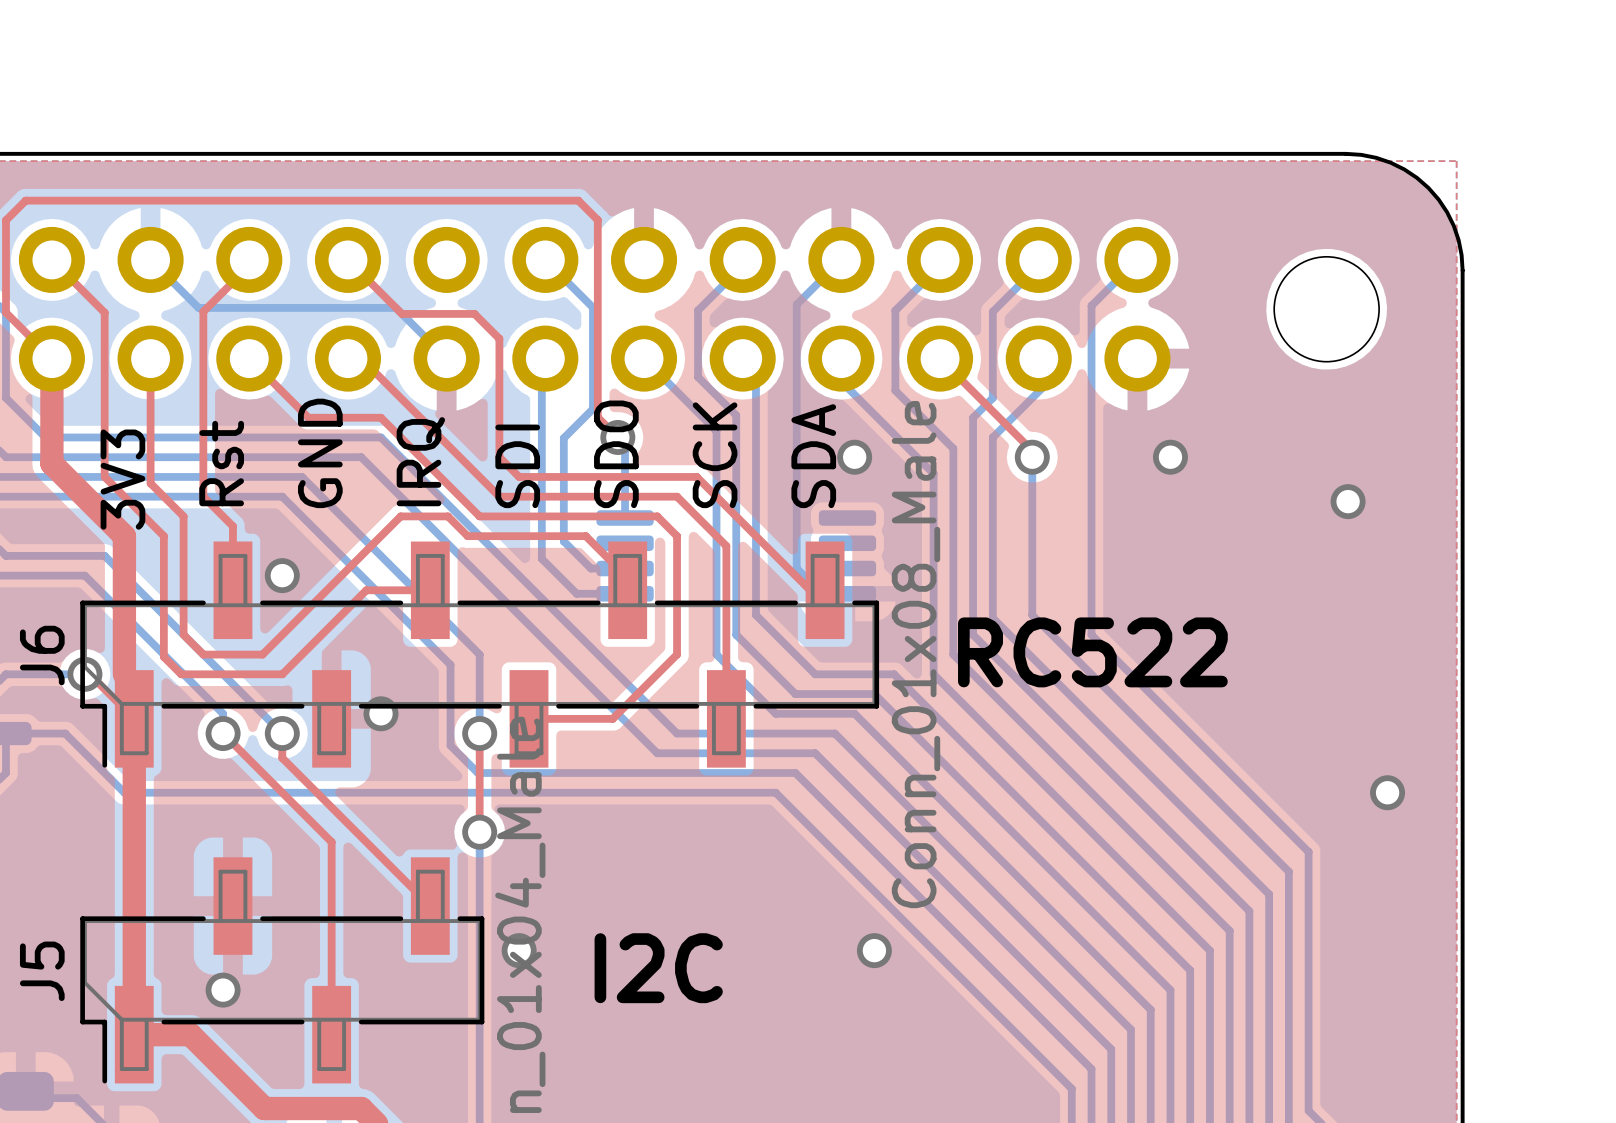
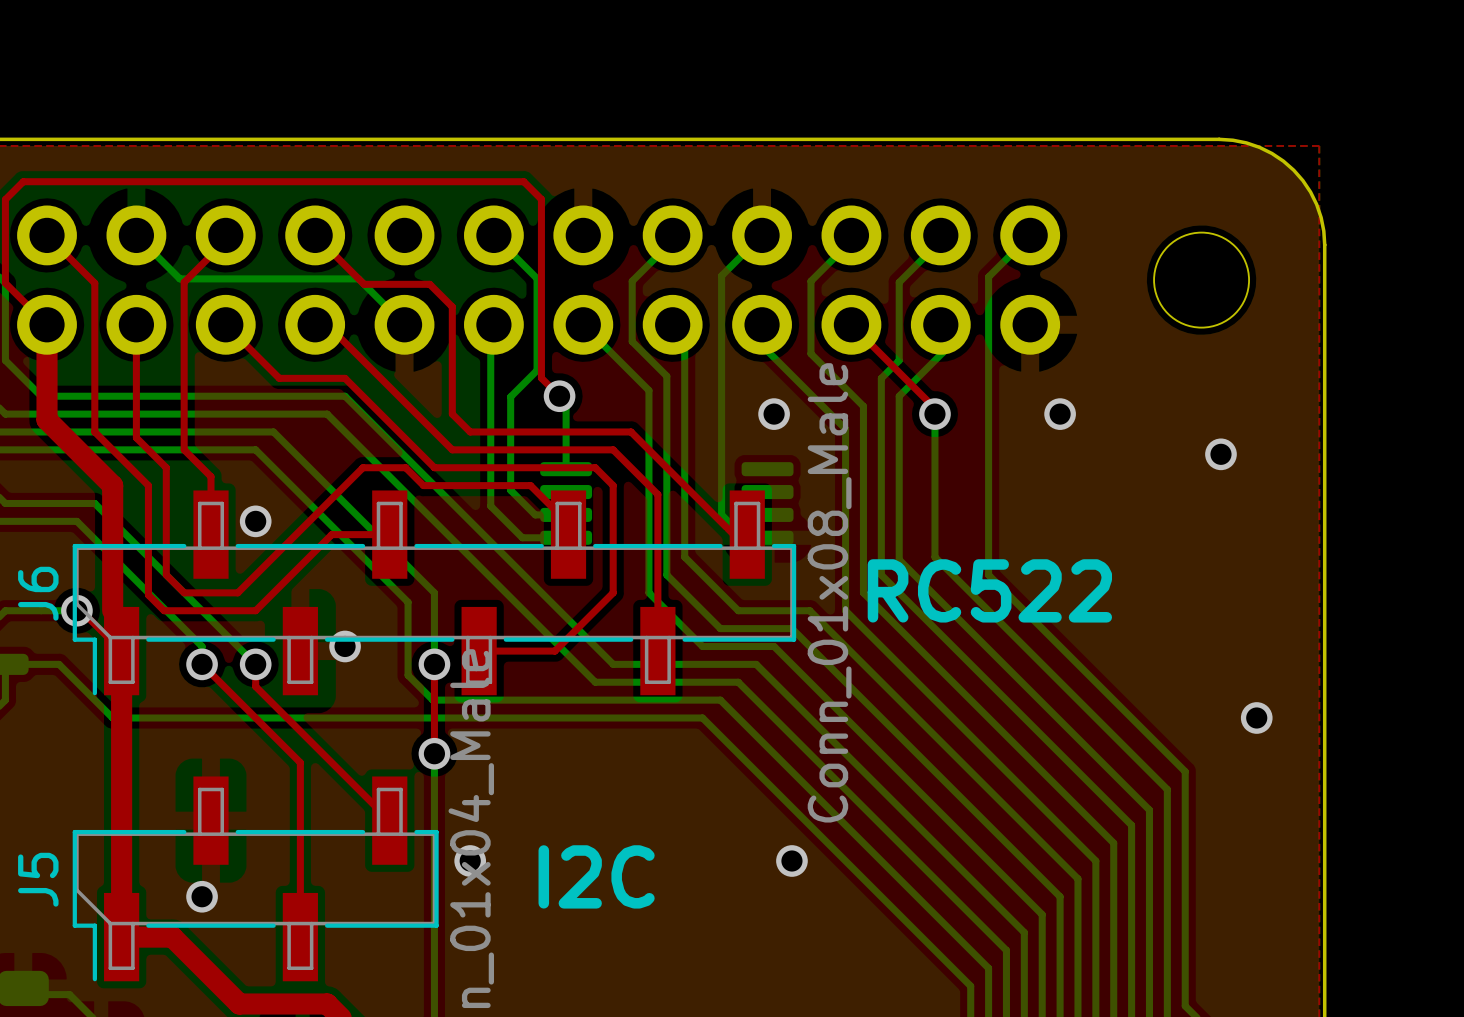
text: GND (320, 453) -> none
text: SDO (616, 454) -> none
text: SCK (715, 455) -> none
text: SDA (813, 456) -> none
text: IRQ (420, 461) -> none
text: Rst (221, 463) -> none
text: SDI (517, 466) -> none
text: 3V3 (122, 479) -> none

